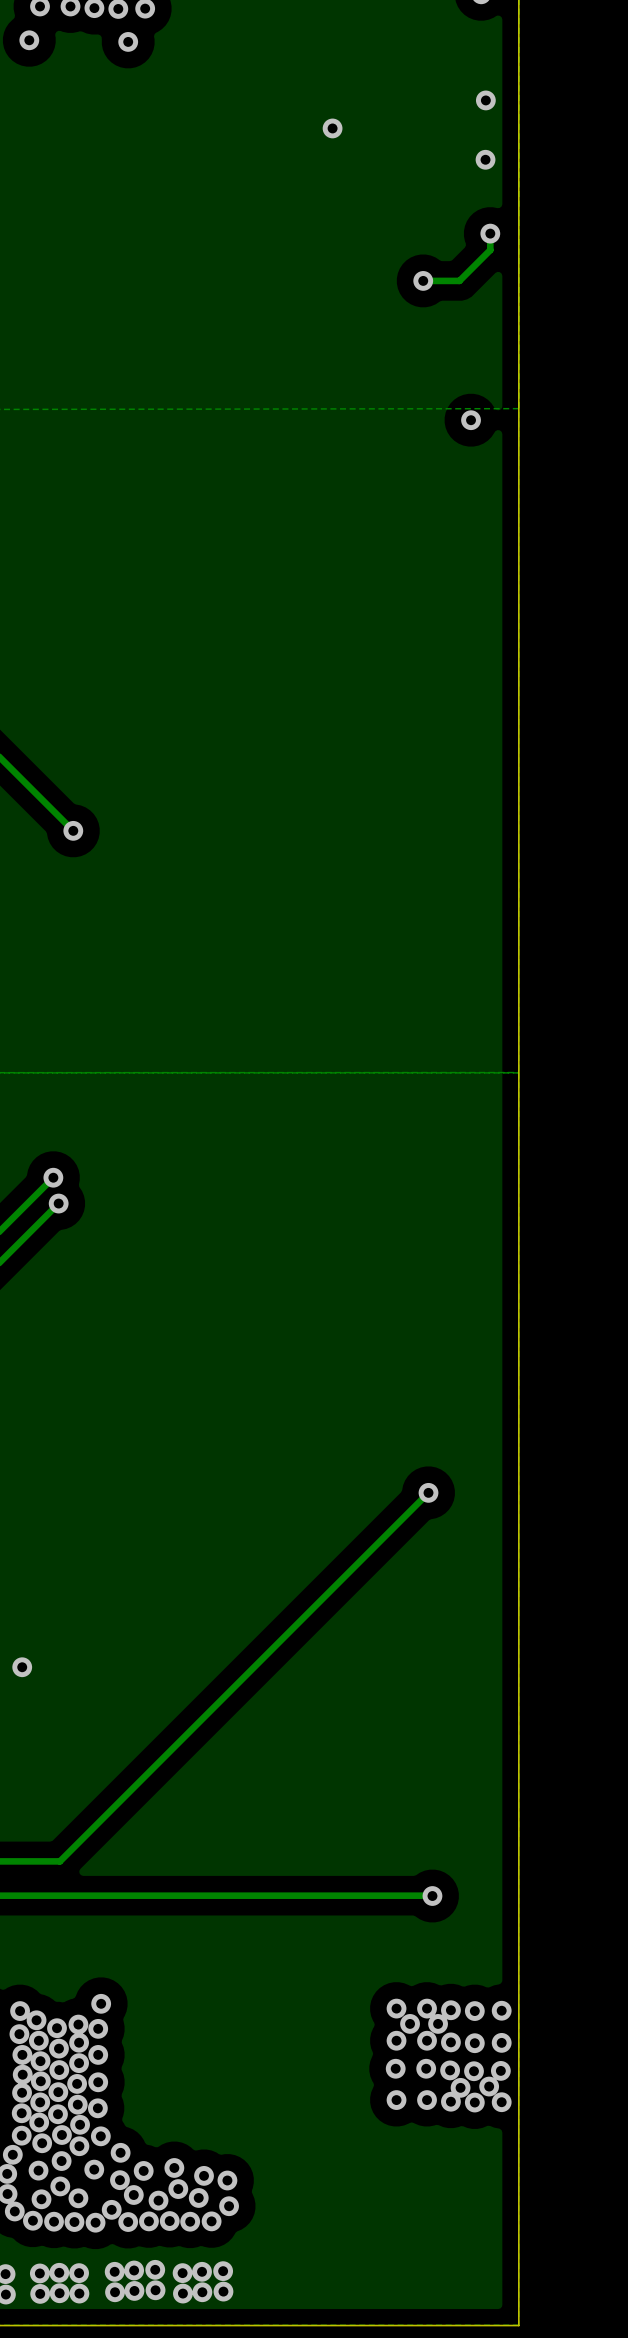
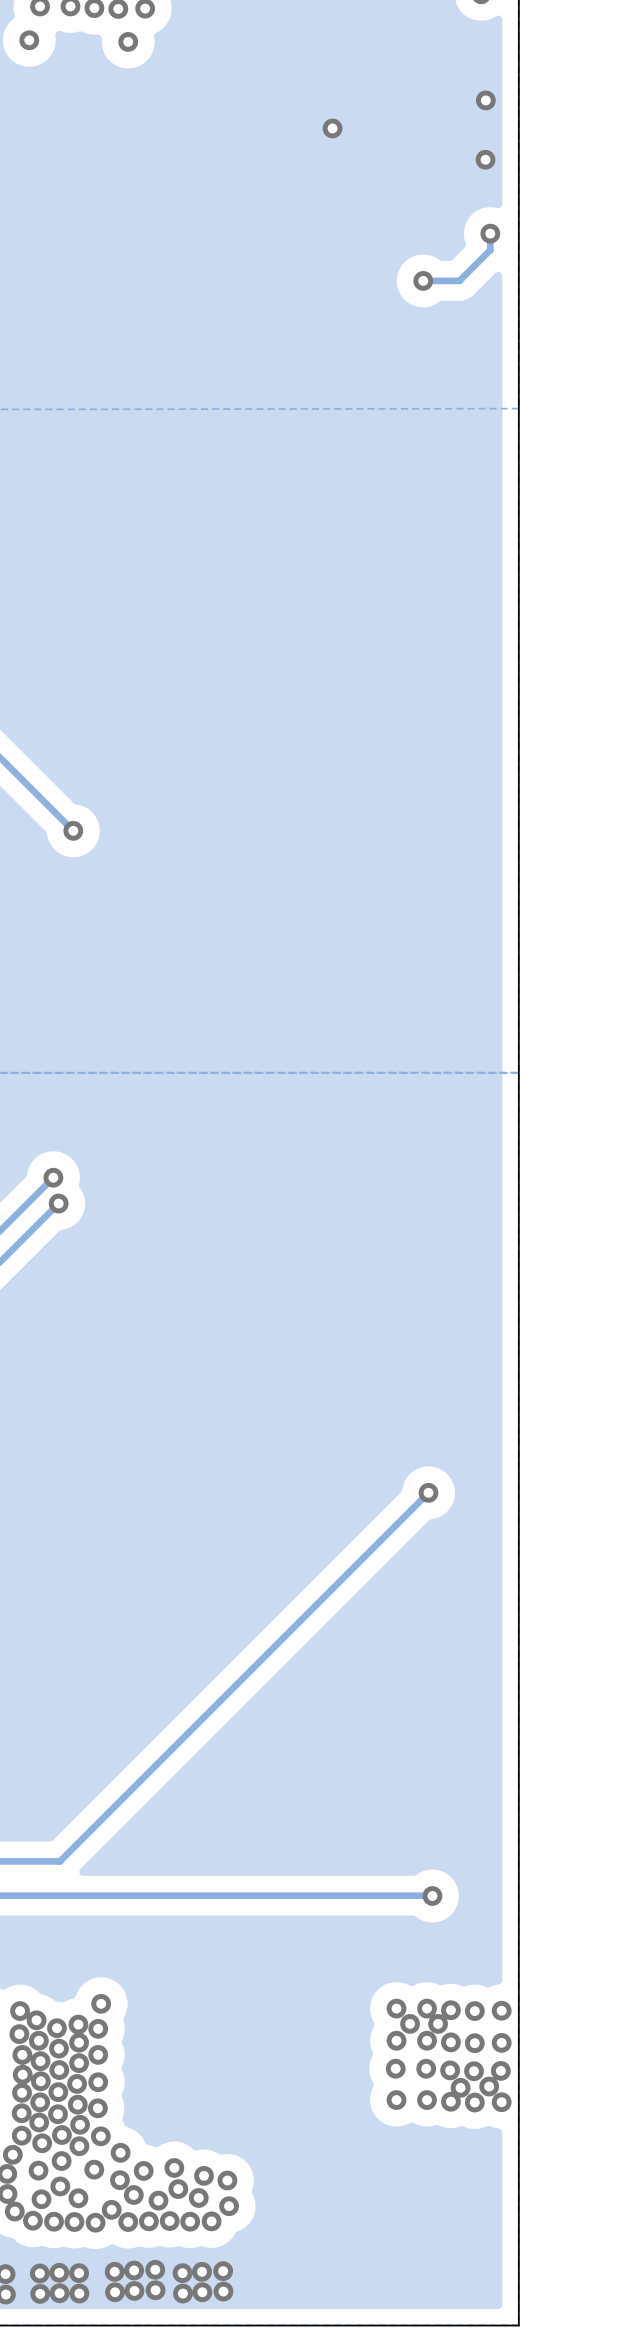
via: (471, 420) -> none
via: (22, 1667) -> none

